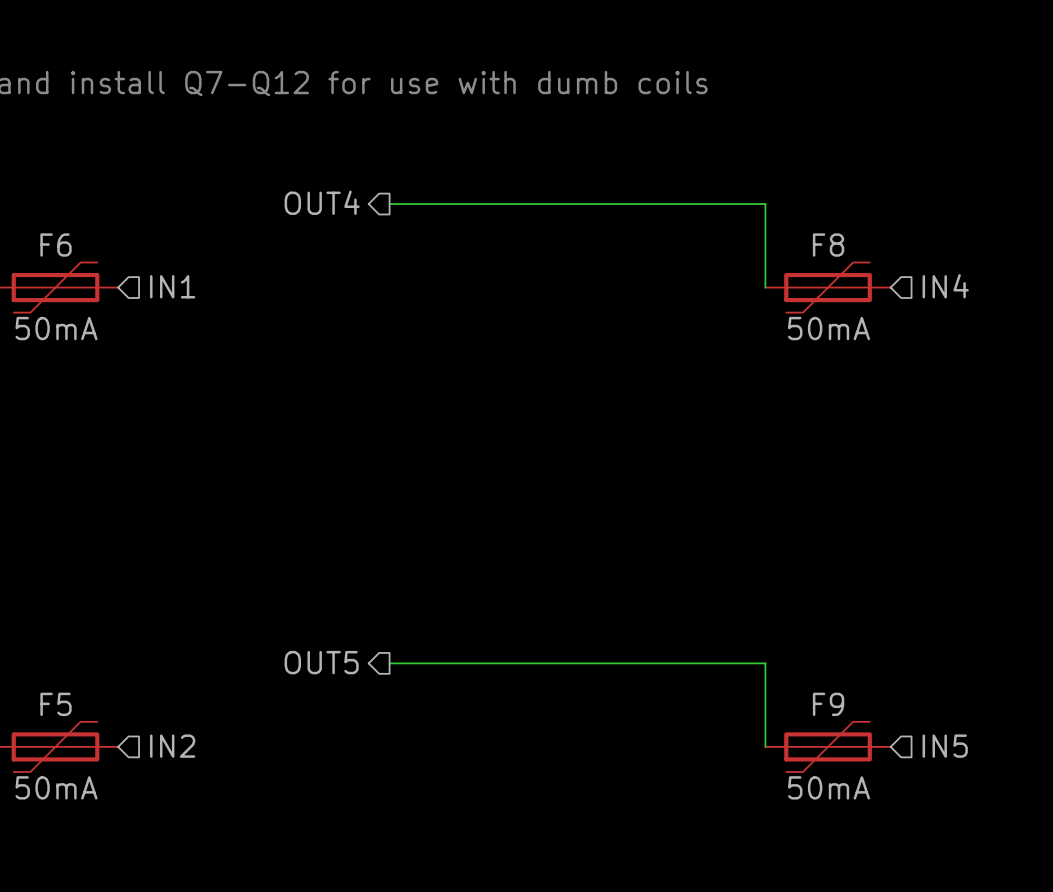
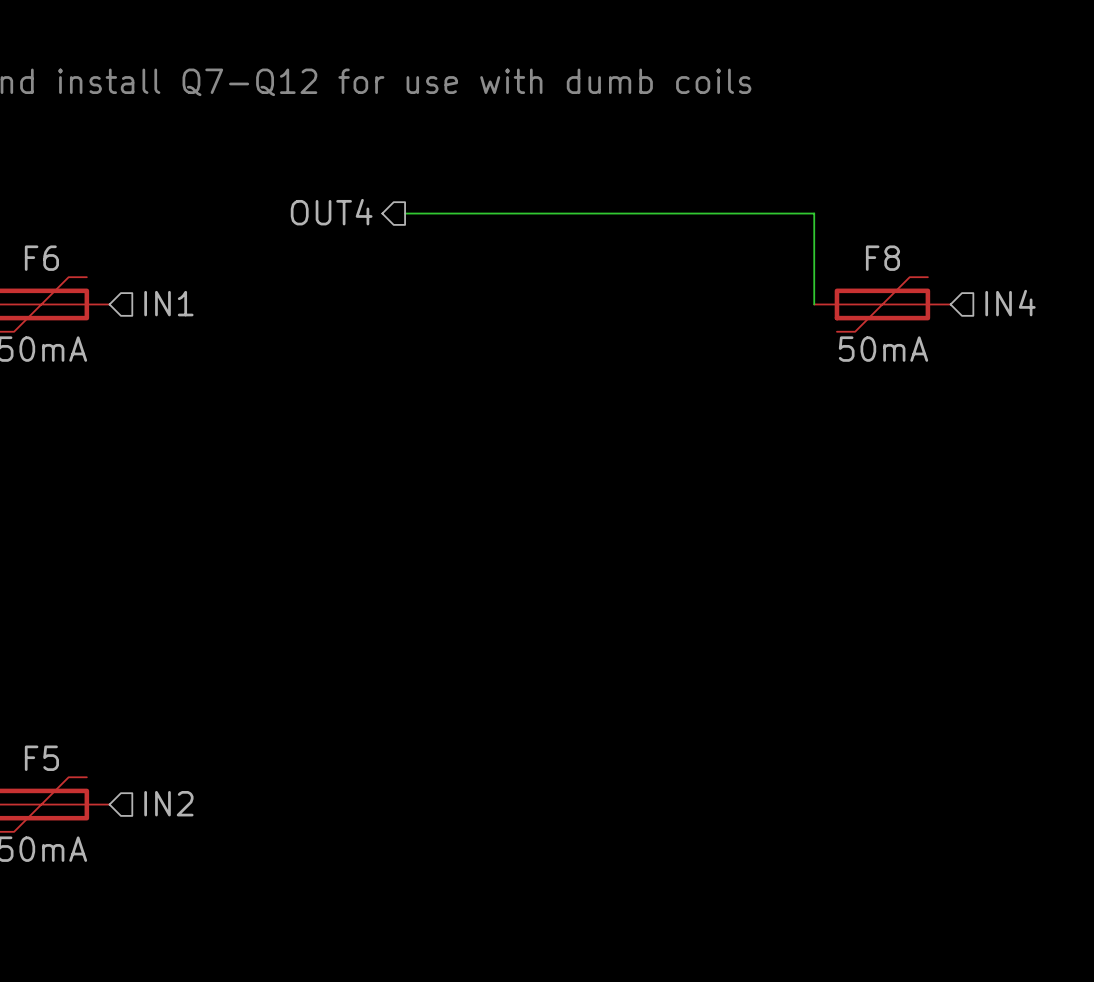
hierarchical label: OUT5 (321, 662) -> none
wire: (389, 663) (765, 663) (765, 746) -> none
F9: 50mA (828, 746) -> none
hierarchical label: IN5 (945, 746) -> none

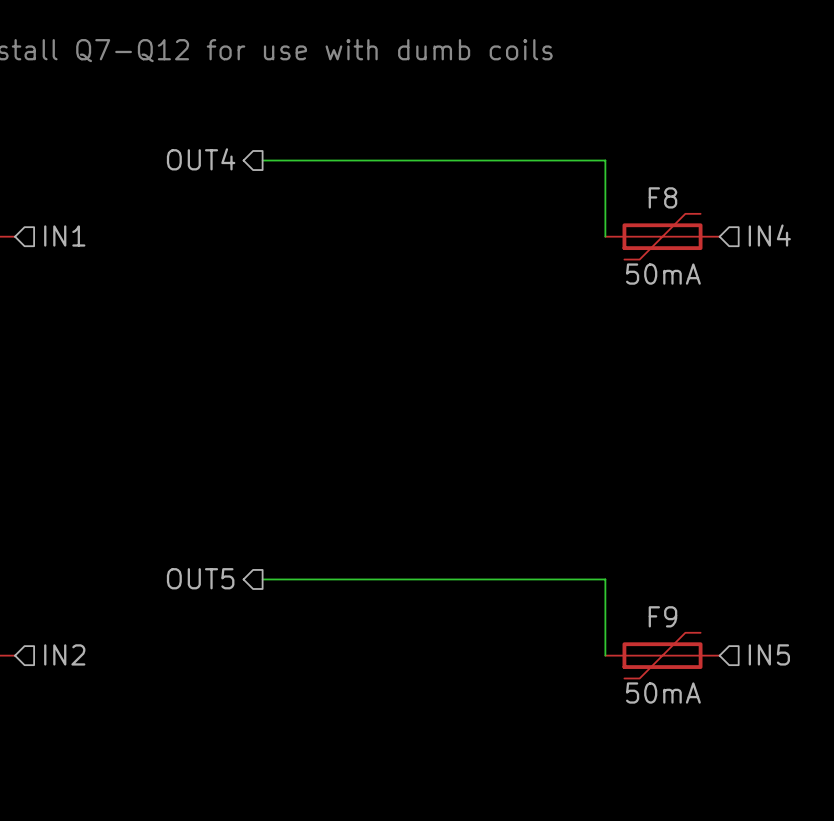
hierarchical label: none -> OUT5 (200, 578)
wire: none -> (262, 579) (605, 579) (605, 655)
hierarchical label: none -> IN5 (769, 654)
F9: none -> 50mA (662, 655)

